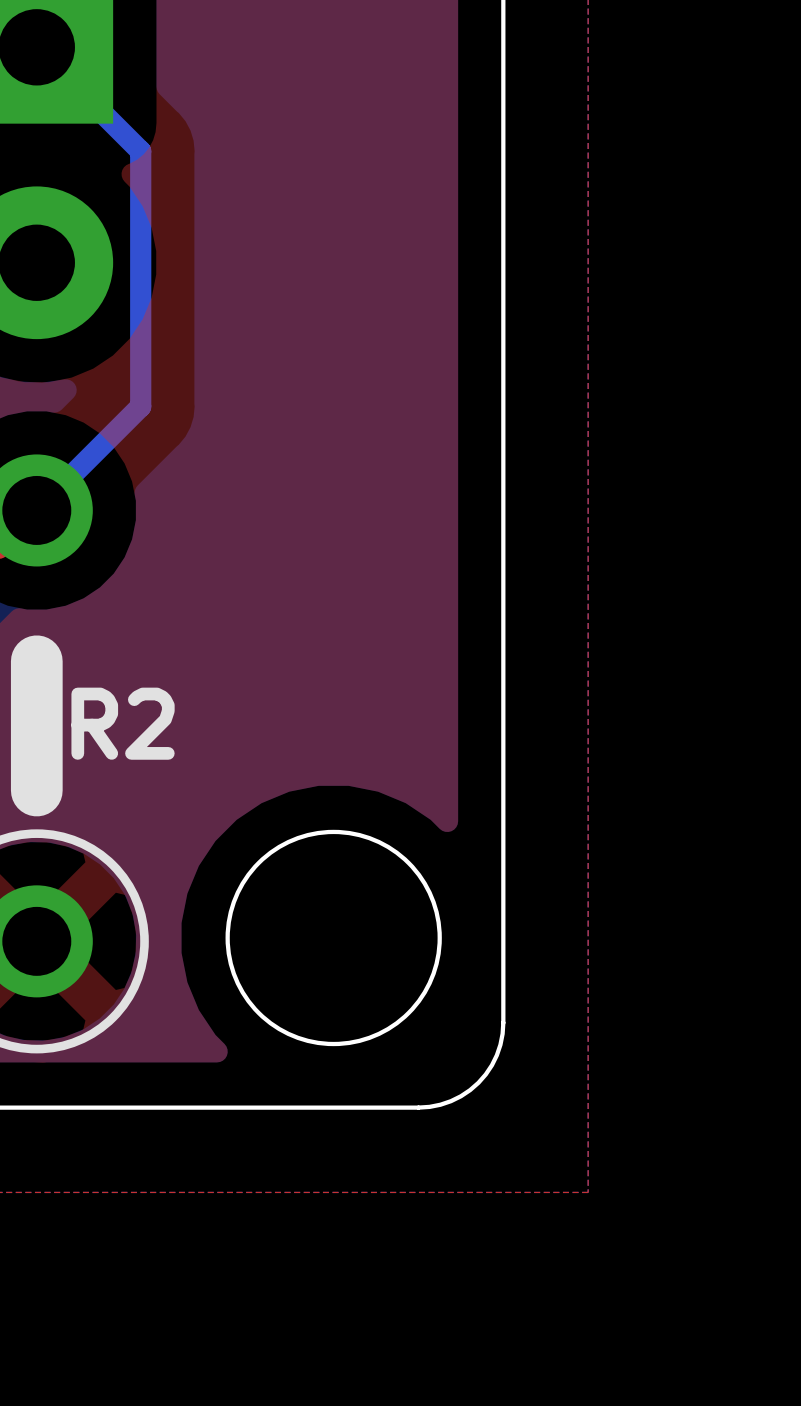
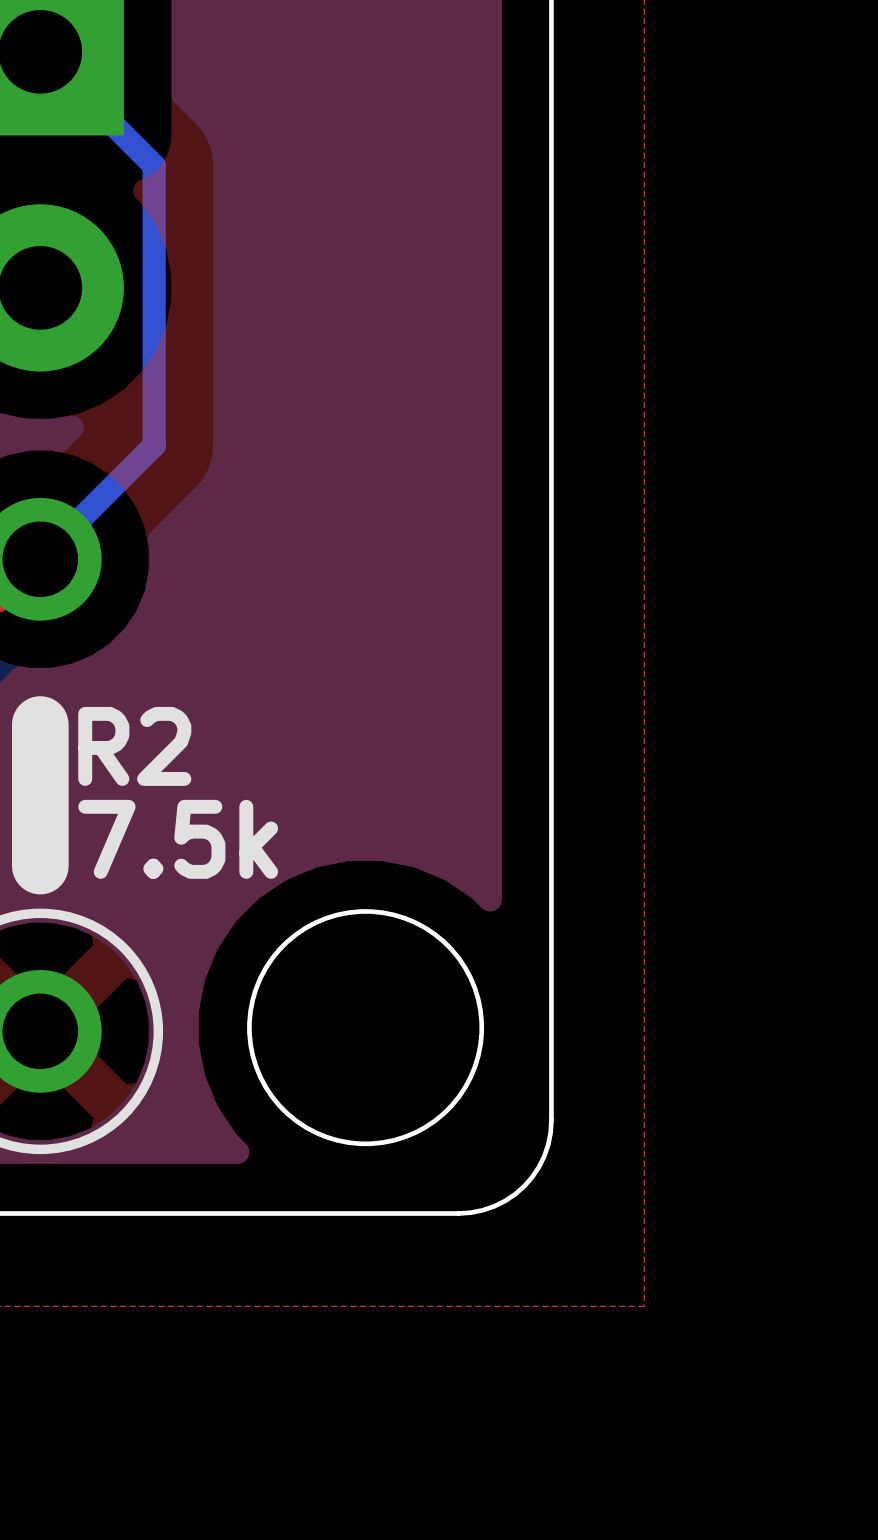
R2 name position: R2 (123, 723) -> R2 (134, 746)
R2 value: none -> 7.5k (178, 839)

